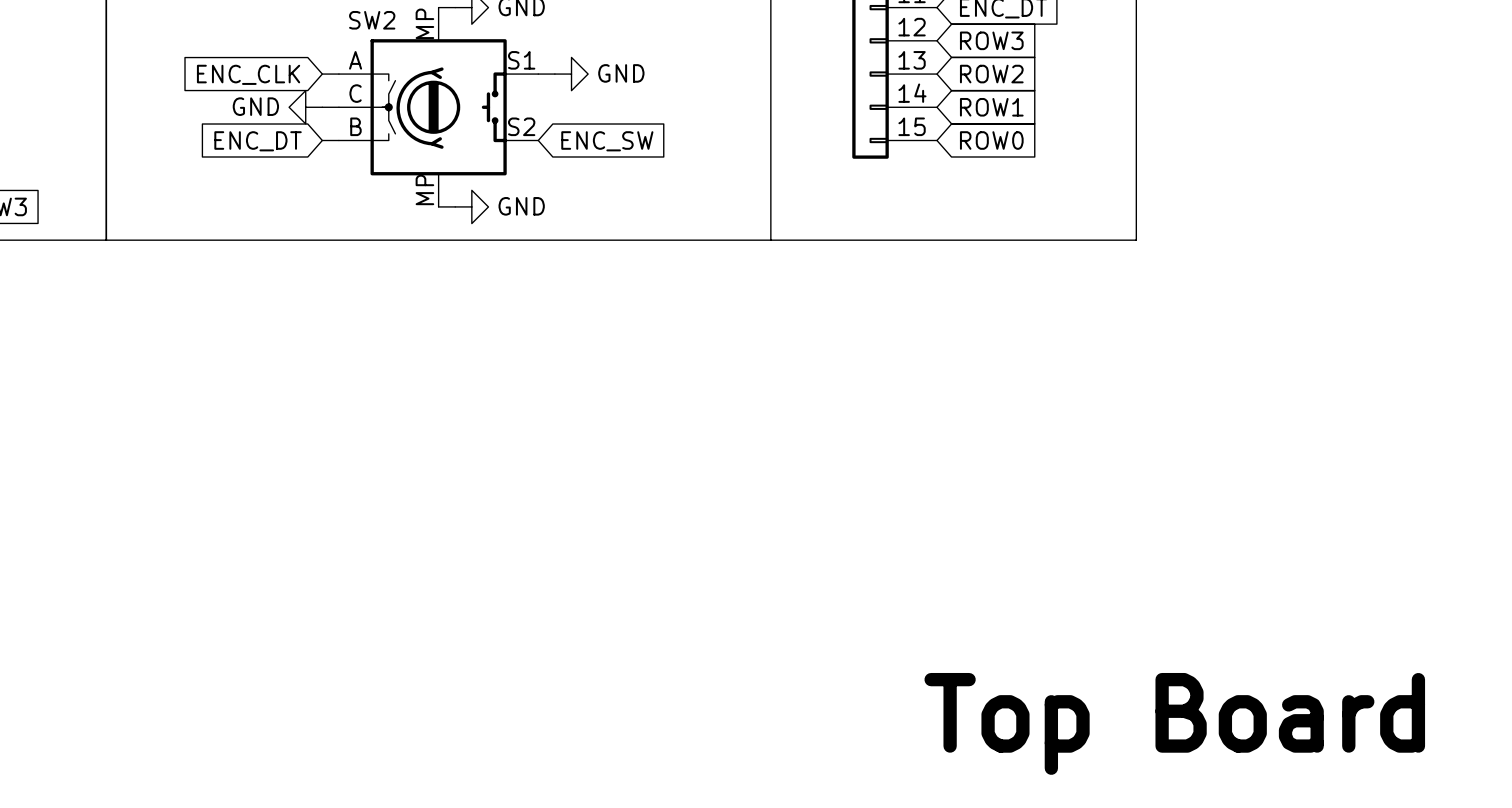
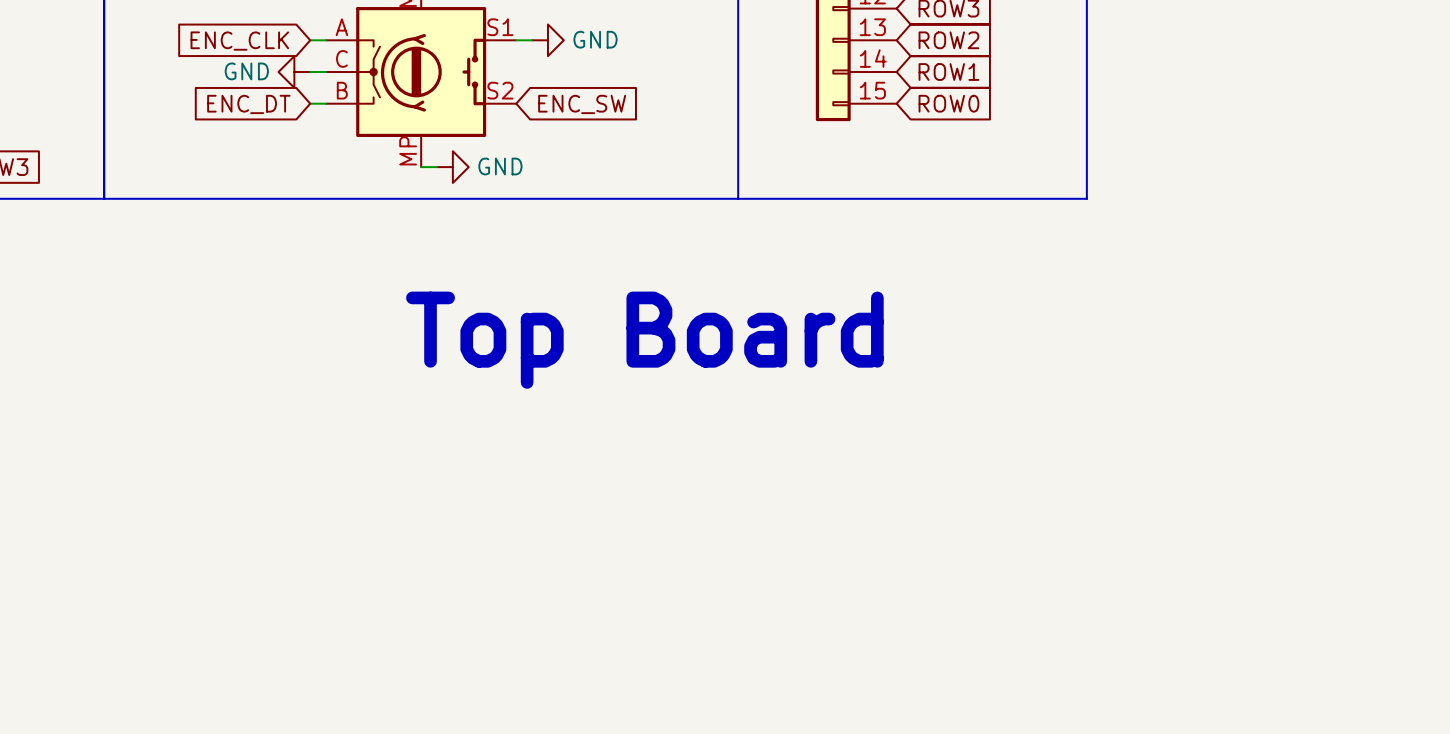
text: none -> Top Board (644, 340)
text: Top Board (1174, 723) -> none

